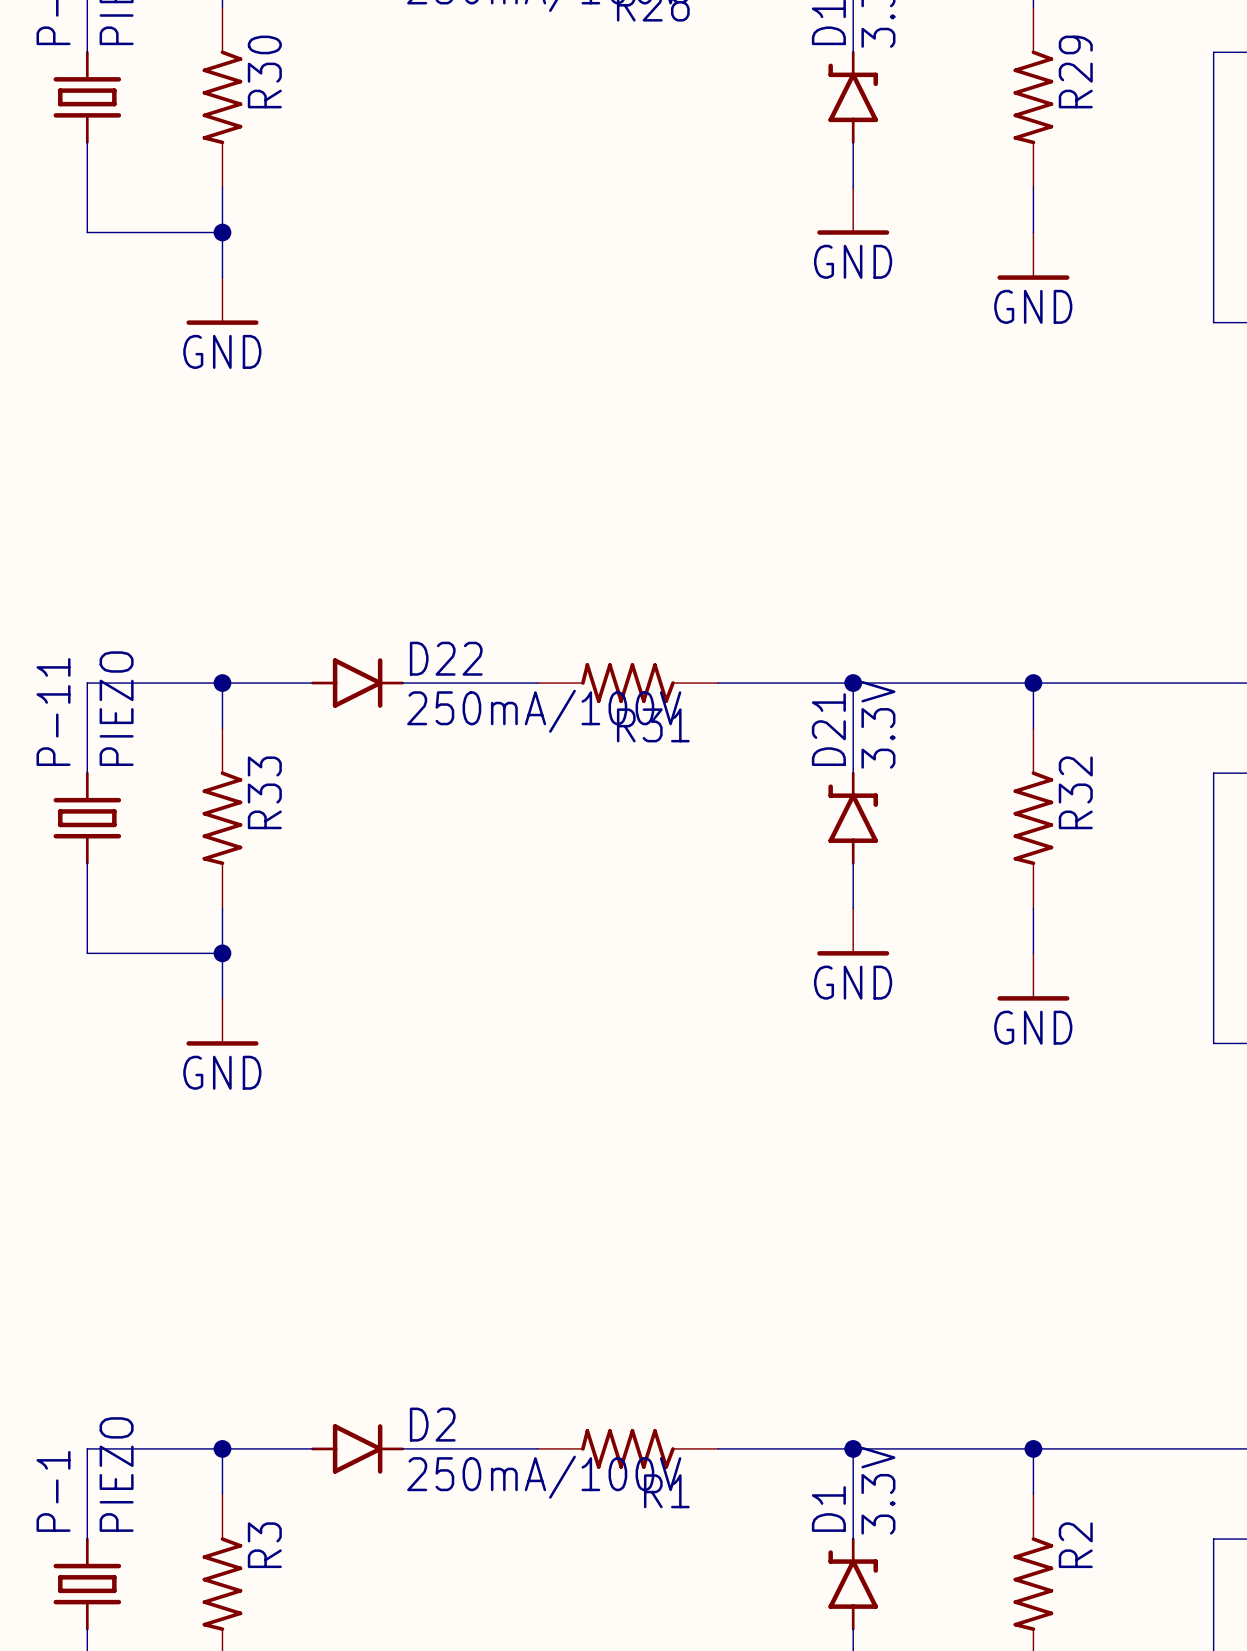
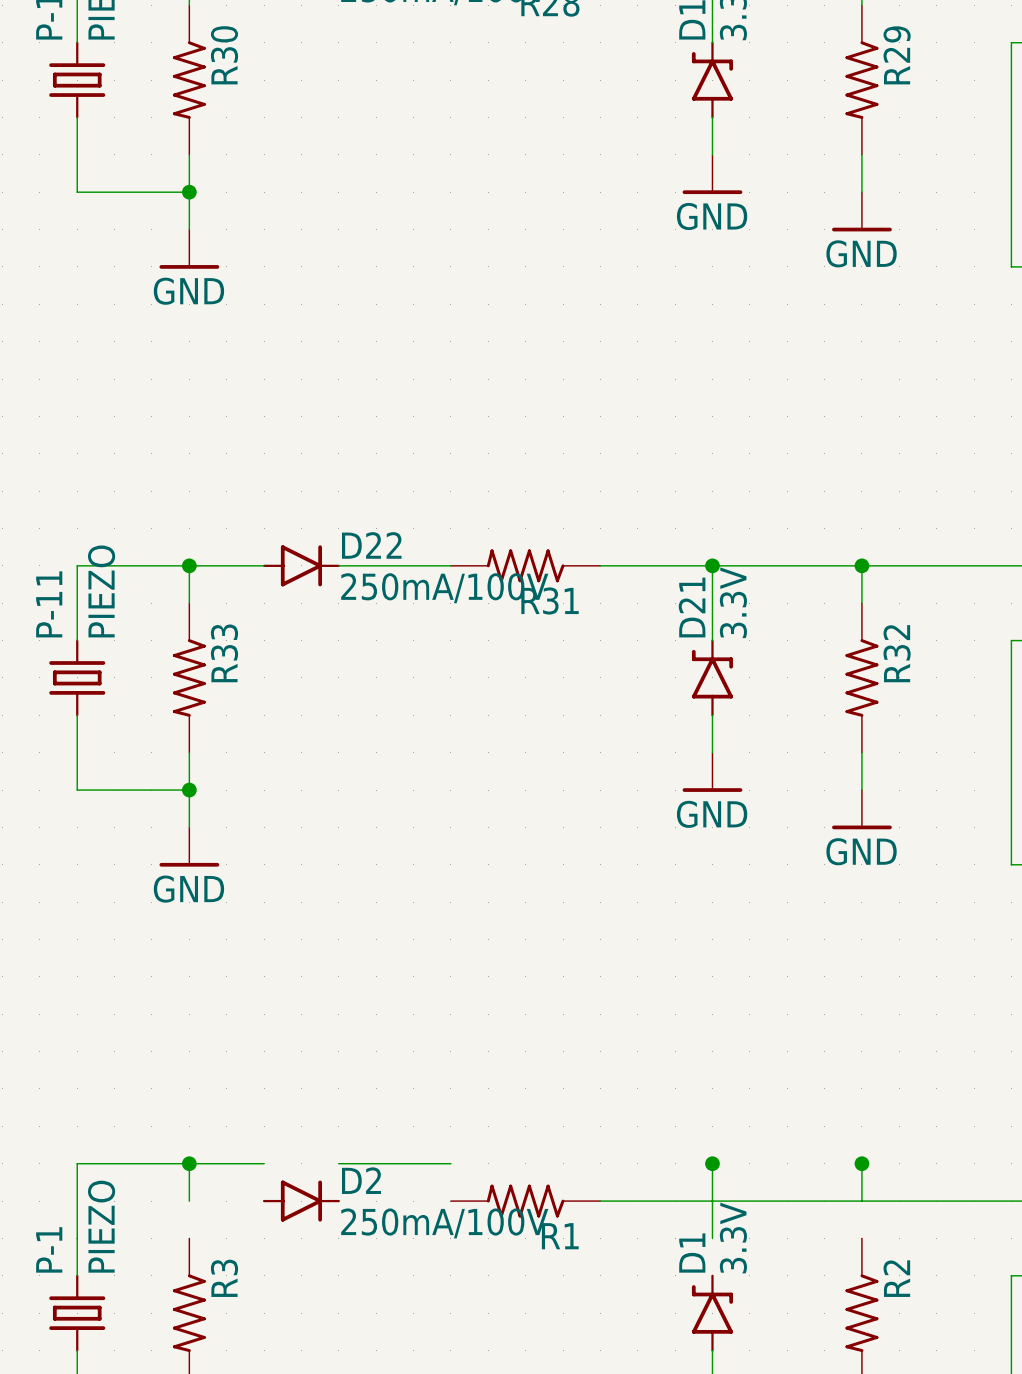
wire: (87, 1448) (312, 1448) -> (77, 1201) (77, 1163) (264, 1163)
wire: (222, 1448) (222, 1493) -> (189, 1201) (189, 1163)
junction position: (222, 1448) -> (189, 1163)
wire: (402, 1448) (537, 1448) -> (338, 1163) (450, 1163)
junction position: (853, 1448) -> (712, 1163)
wire: (1033, 1448) (1033, 1493) -> (861, 1201) (861, 1163)
junction position: (1033, 1448) -> (861, 1163)
wire: (853, 1493) (853, 1539) -> (712, 1163) (712, 1201)

